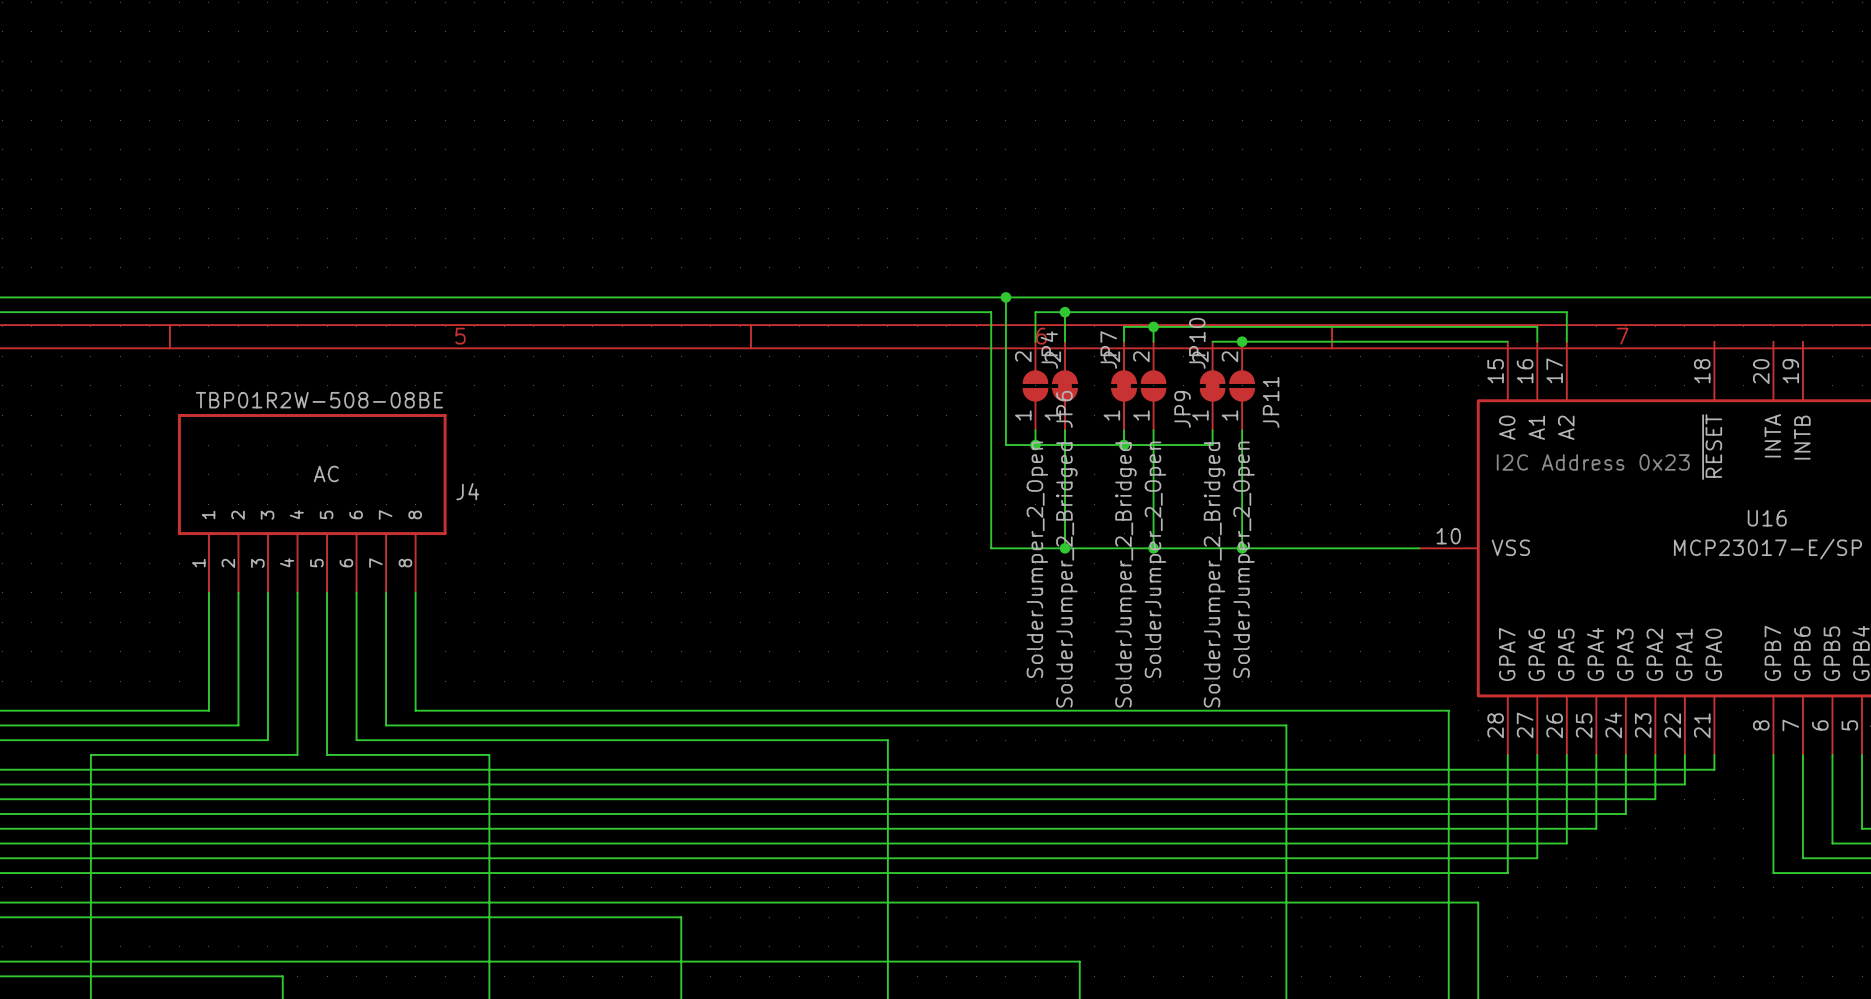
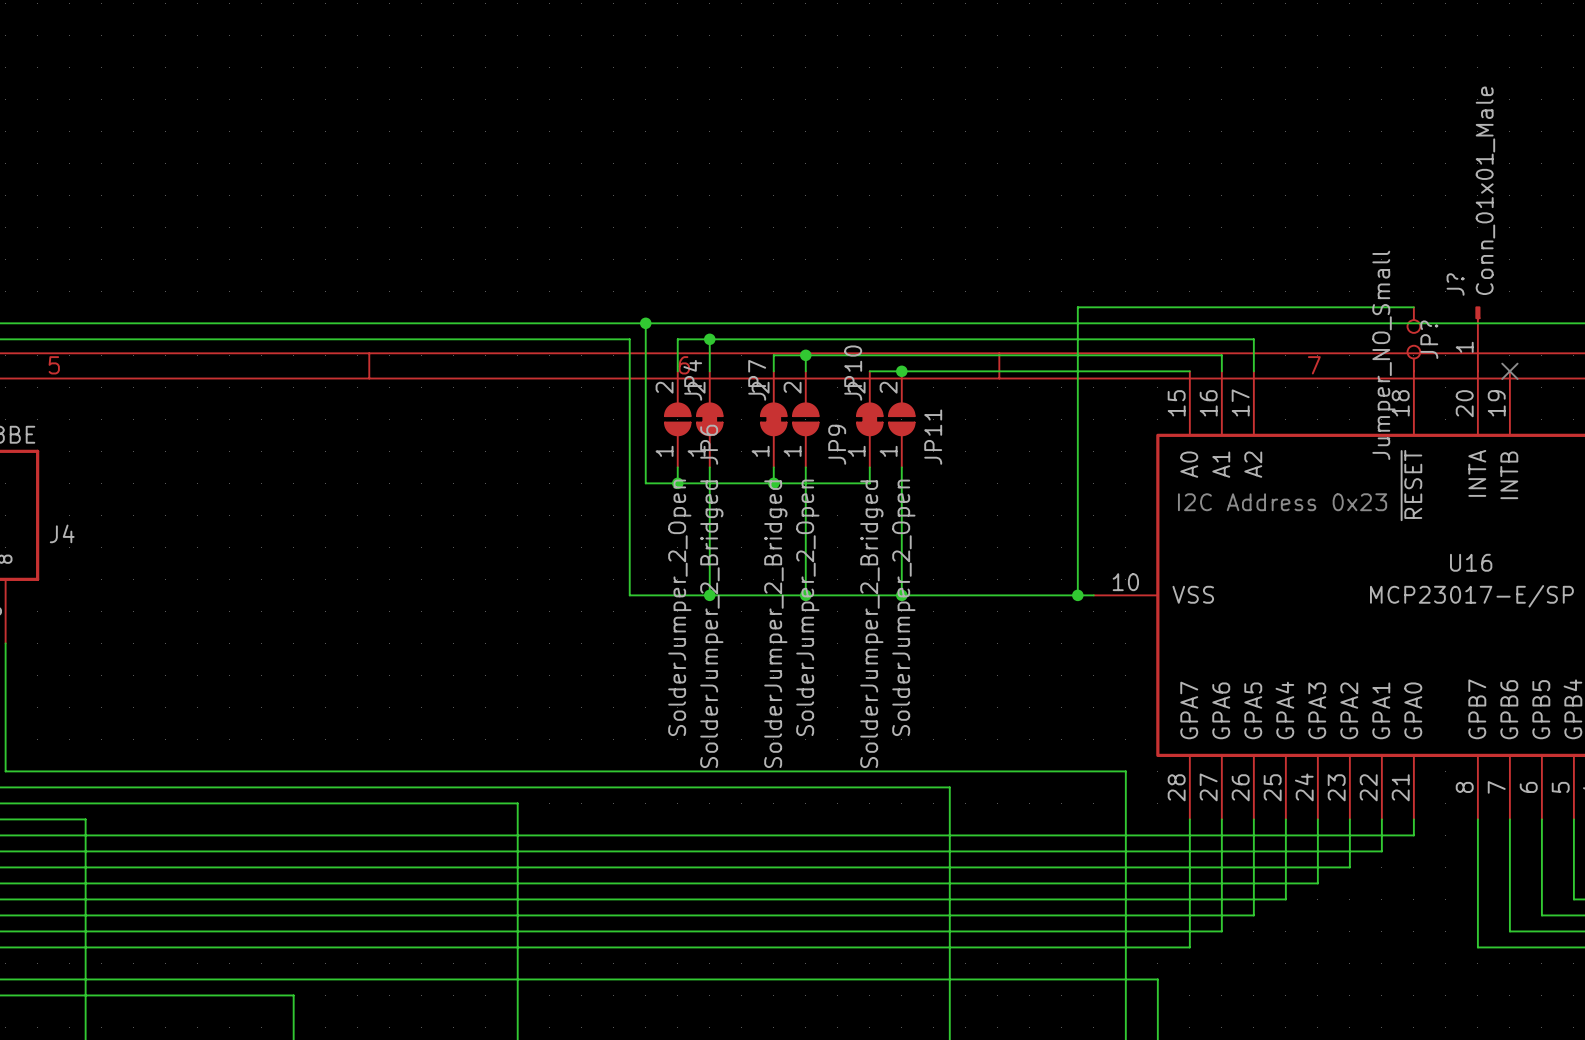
wire: none -> (1413, 307) (1077, 307) (1077, 595)
J?: none -> Conn_01x01_Male (1477, 338)
JP?: none -> Jumper_NO_Small (1413, 339)
no-connect mark: none -> (1509, 371)
junction: none -> (1077, 595)

